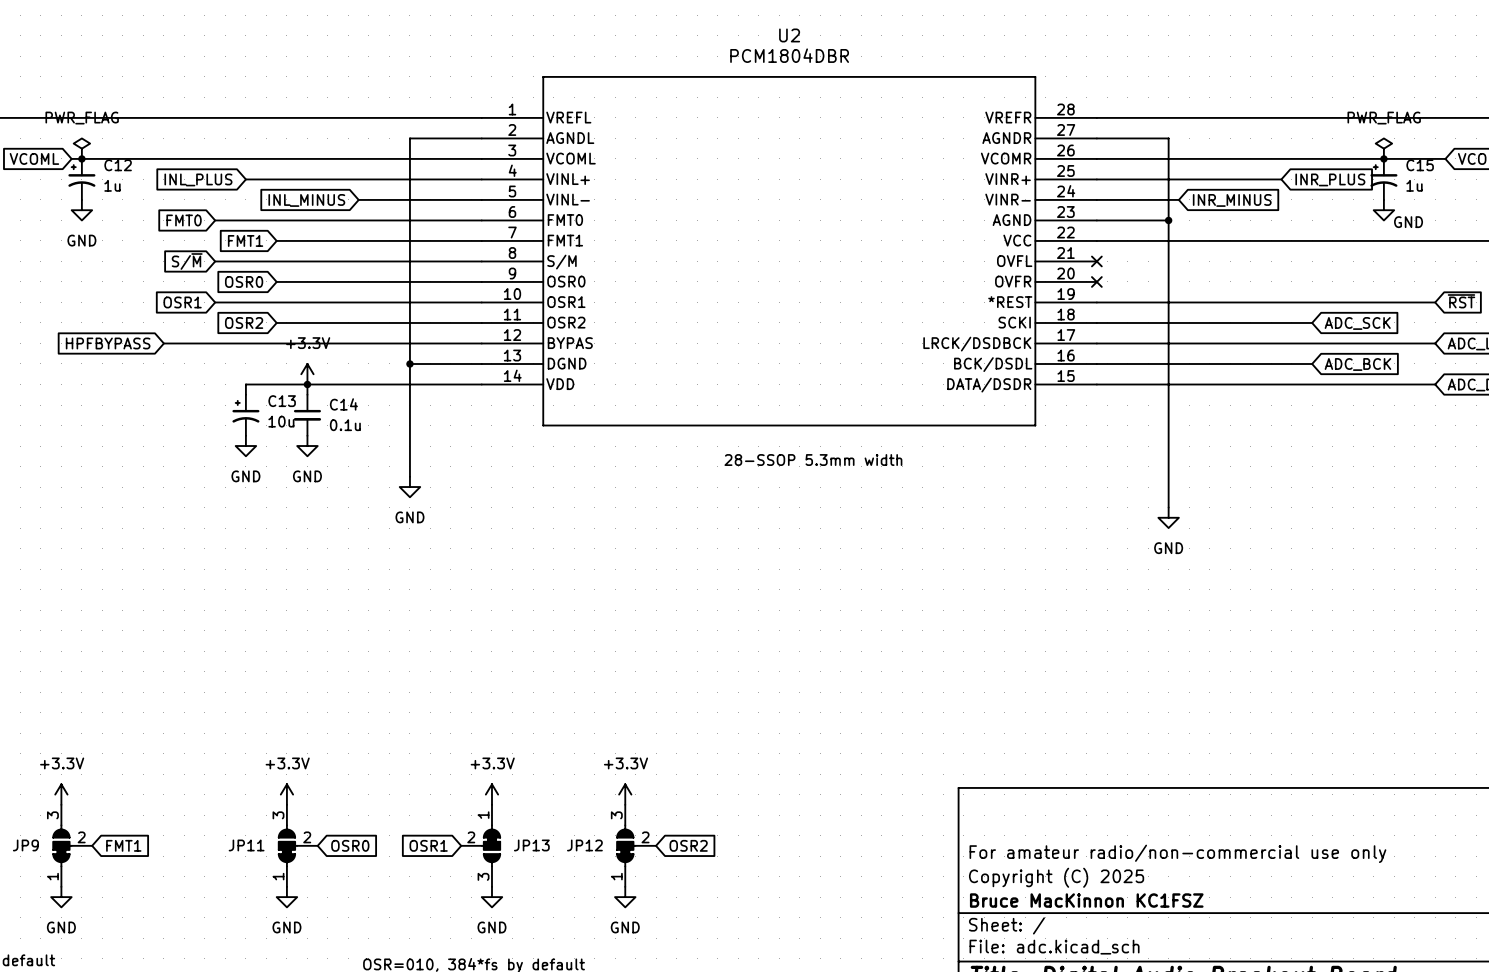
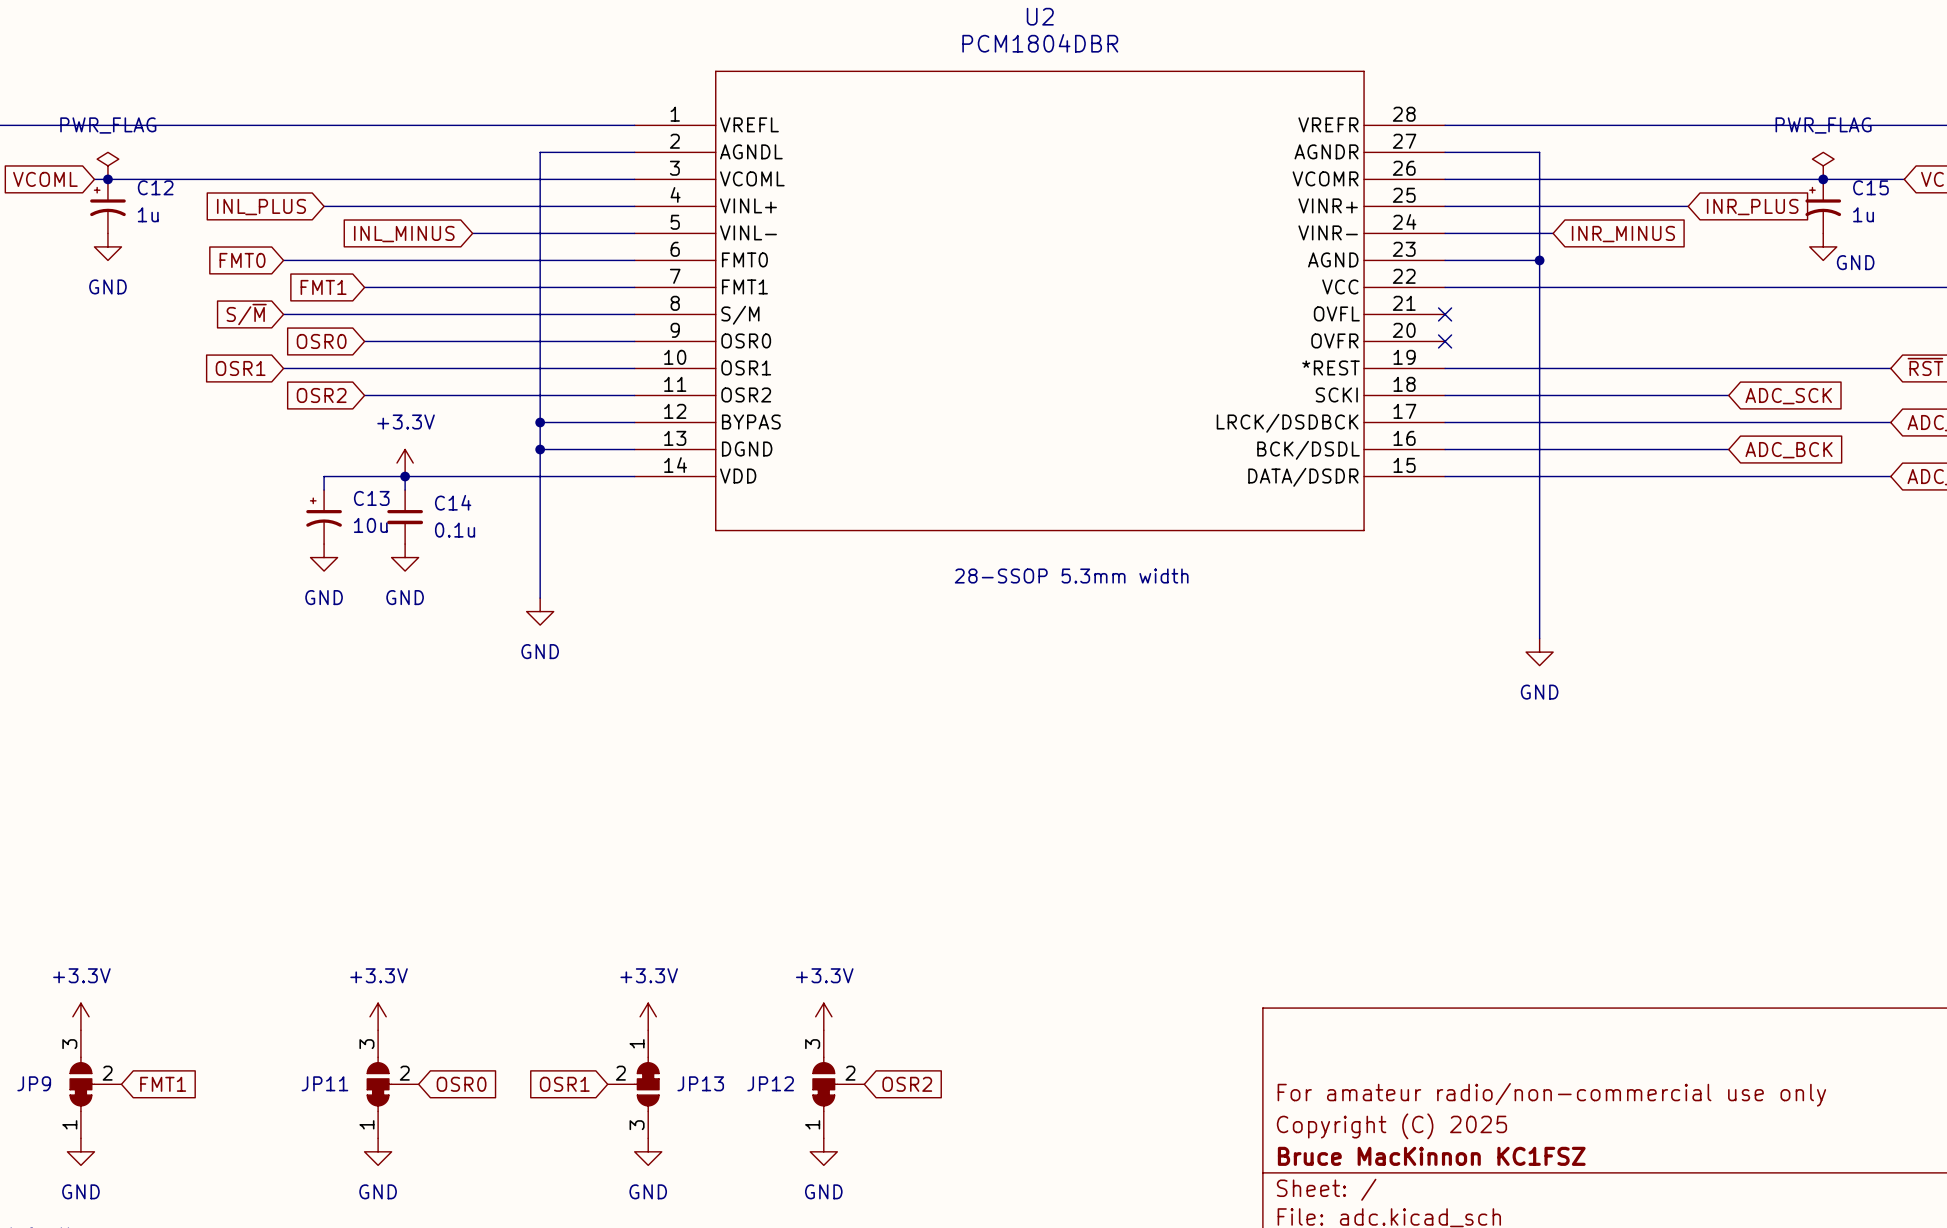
global label: HPFBYPASS (108, 343) -> none
wire: (163, 343) (409, 343) -> none
junction: none -> (540, 422)

